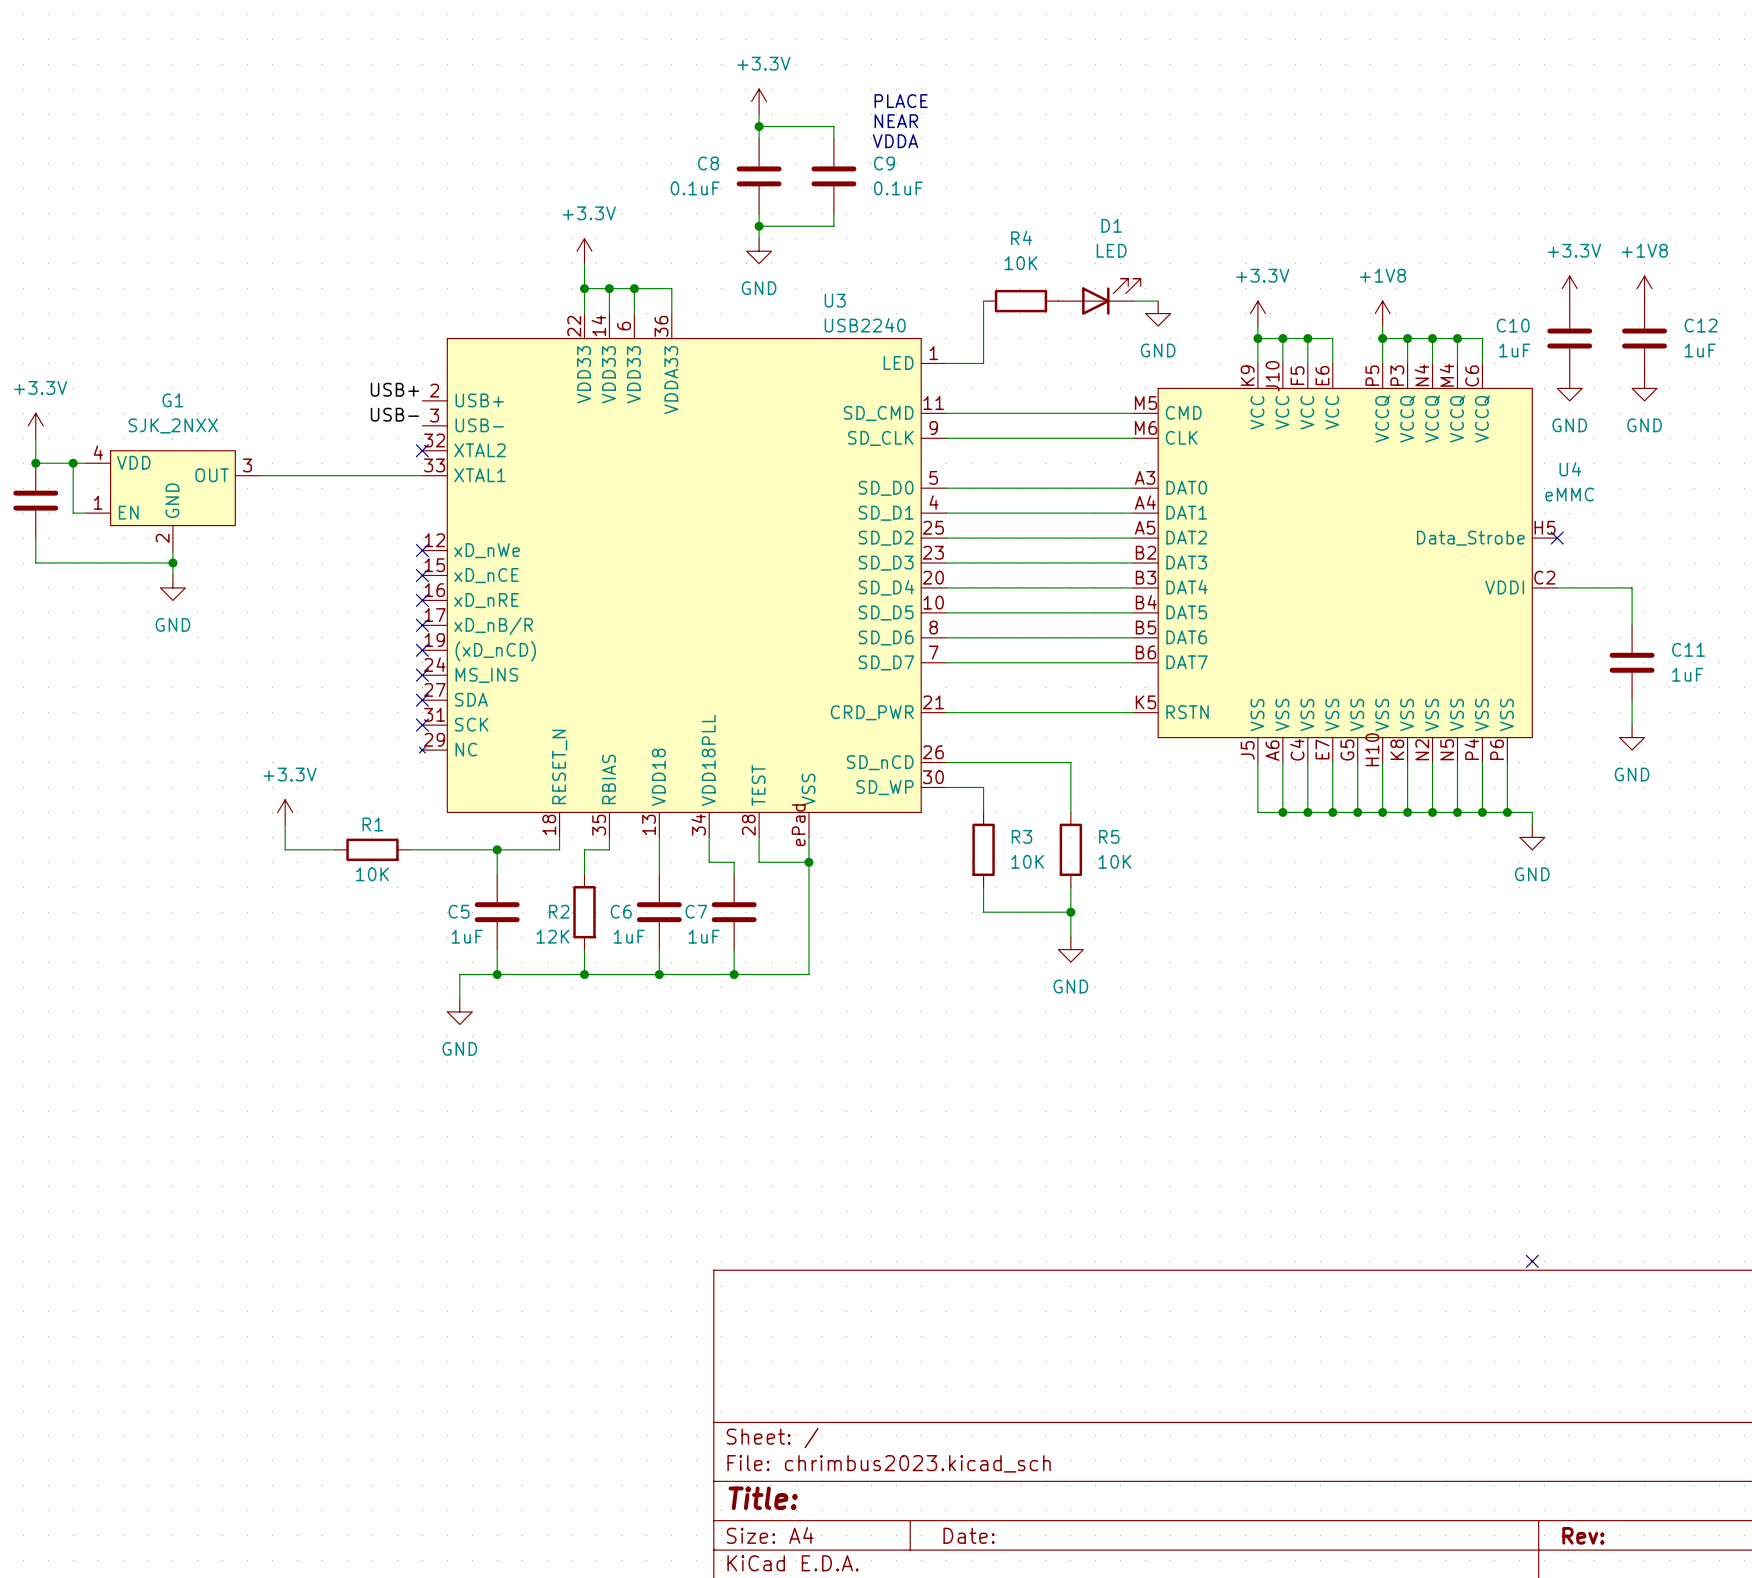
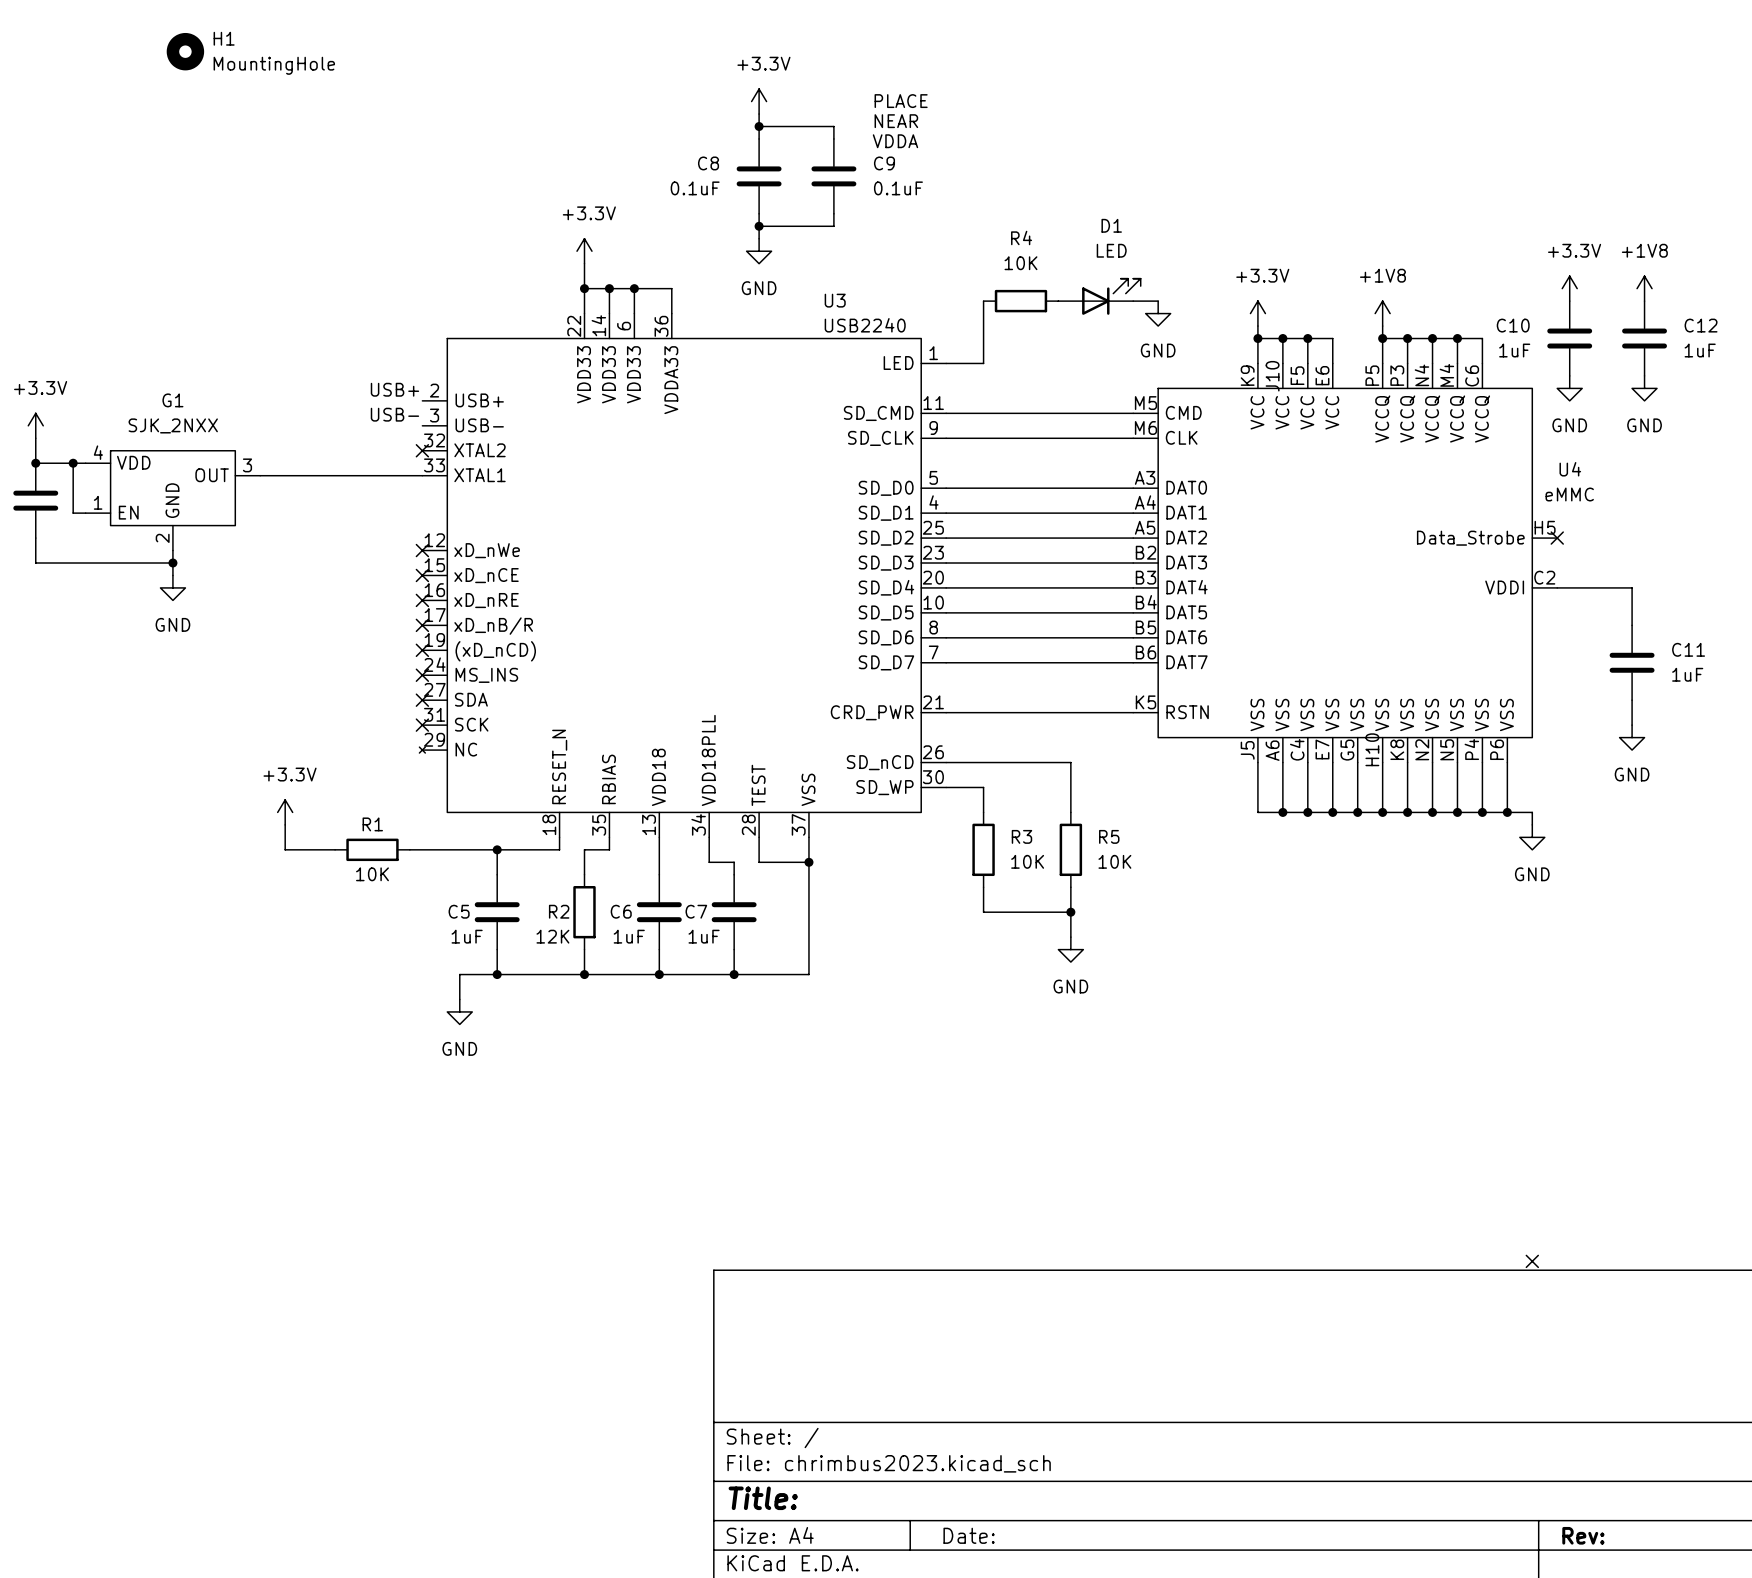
H1: none -> MountingHole (185, 51)
U3 pin number: ePad (798, 825) -> 37 (798, 824)

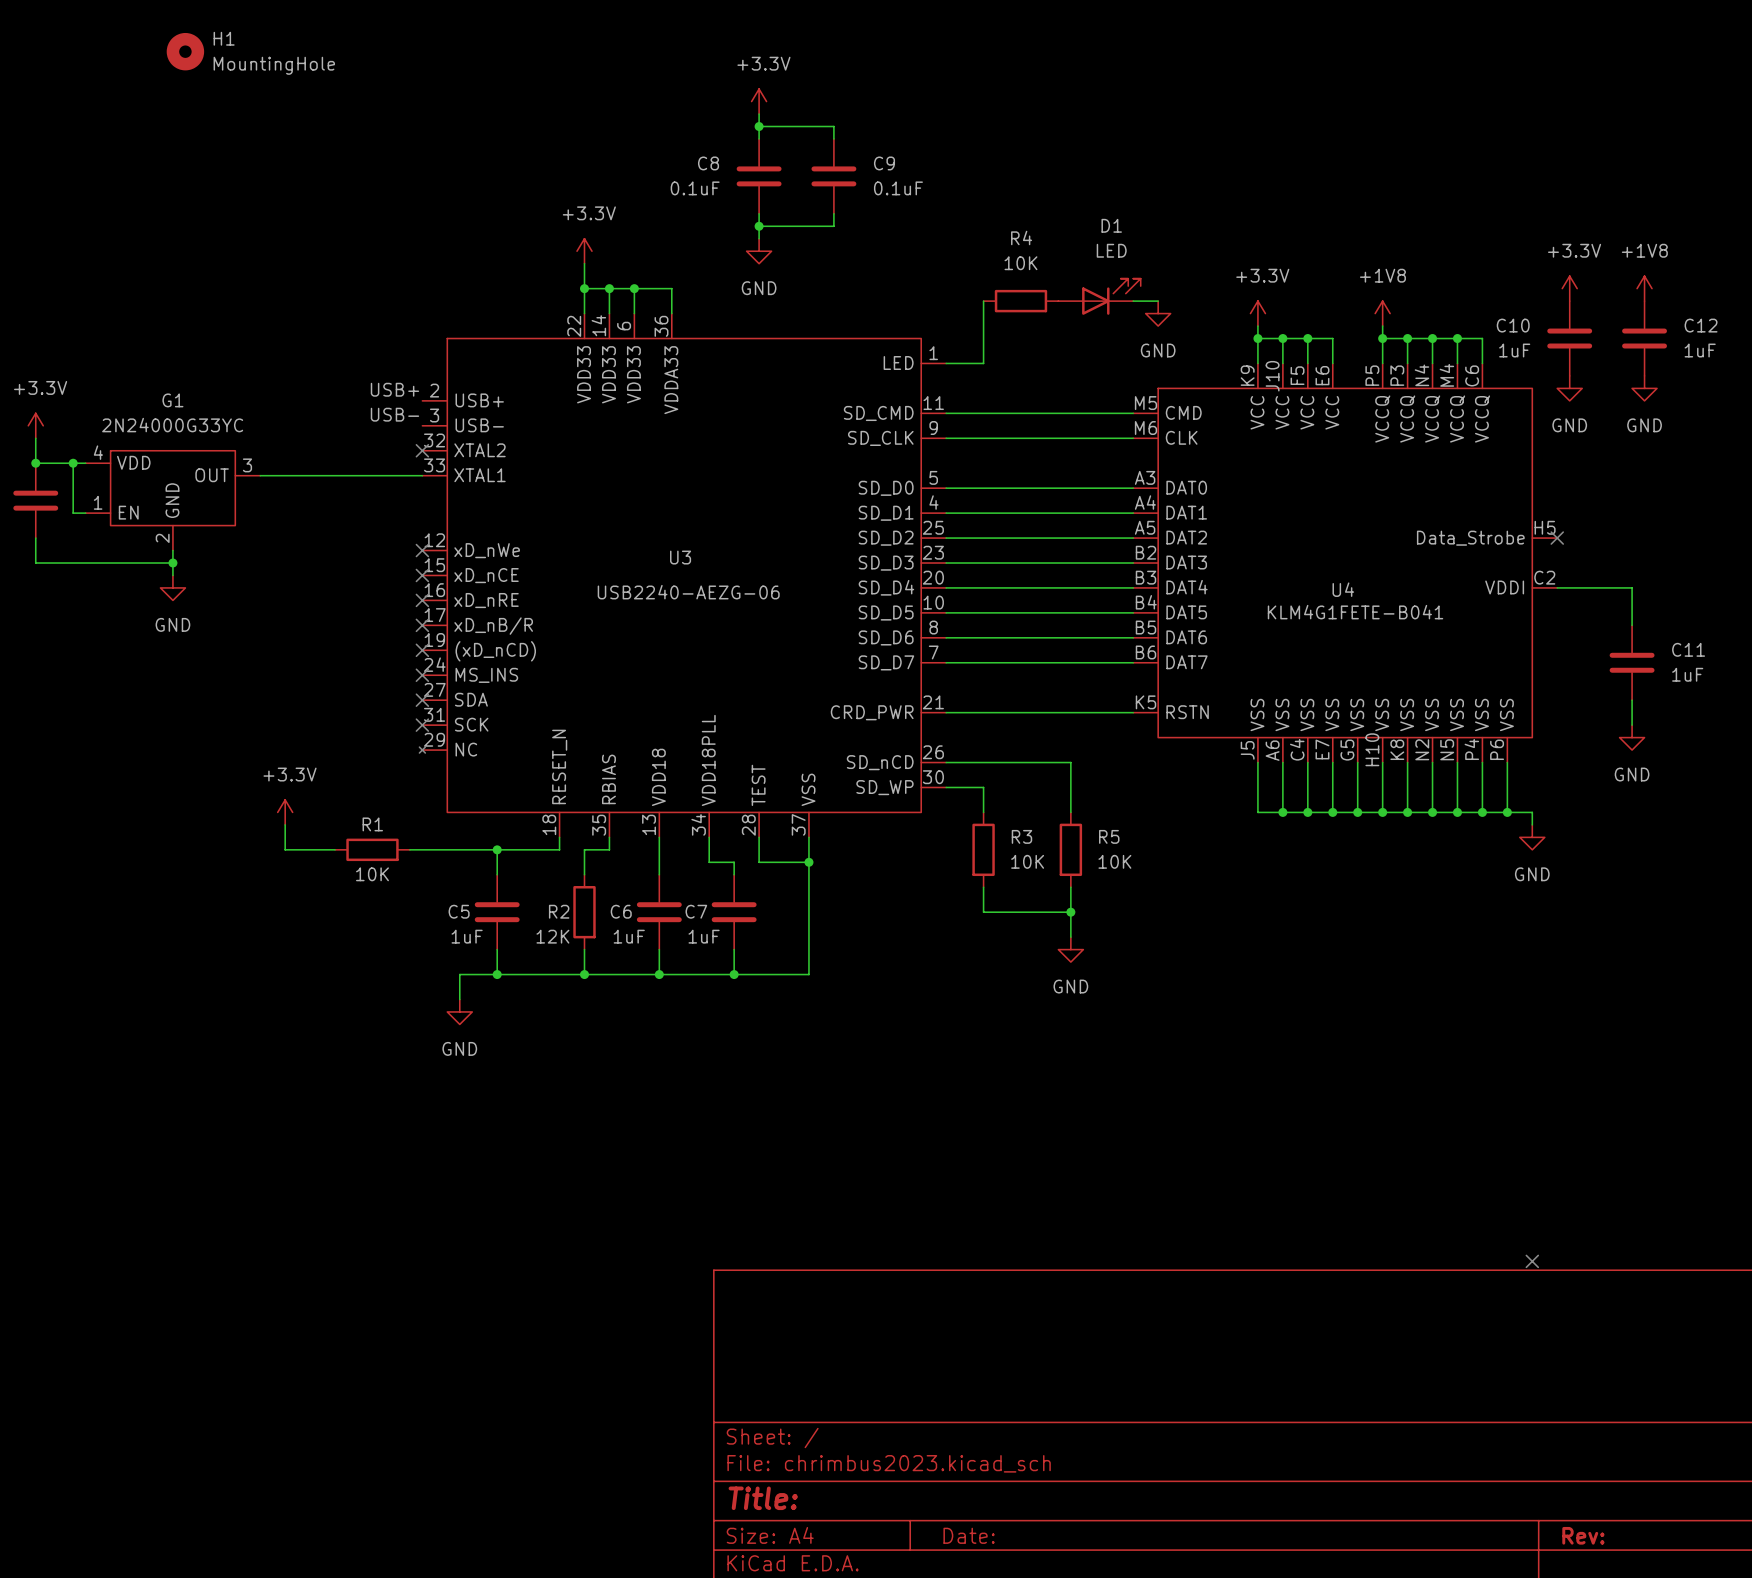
text: PLACE (901, 101) -> none
text: NEAR (896, 121) -> none
text: VDDA (895, 141) -> none
U3 name position: U3 (835, 300) -> U3 (680, 557)
U3 value: USB2240 (865, 325) -> USB2240-AEZG-06 (688, 592)
G1 value: SJK_2NXX (173, 425) -> 2N24000G33YC (172, 425)
U4 name position: U4 (1570, 469) -> U4 (1343, 589)
U4 value: eMMC (1569, 494) -> KLM4G1FETE-B041 (1355, 612)

